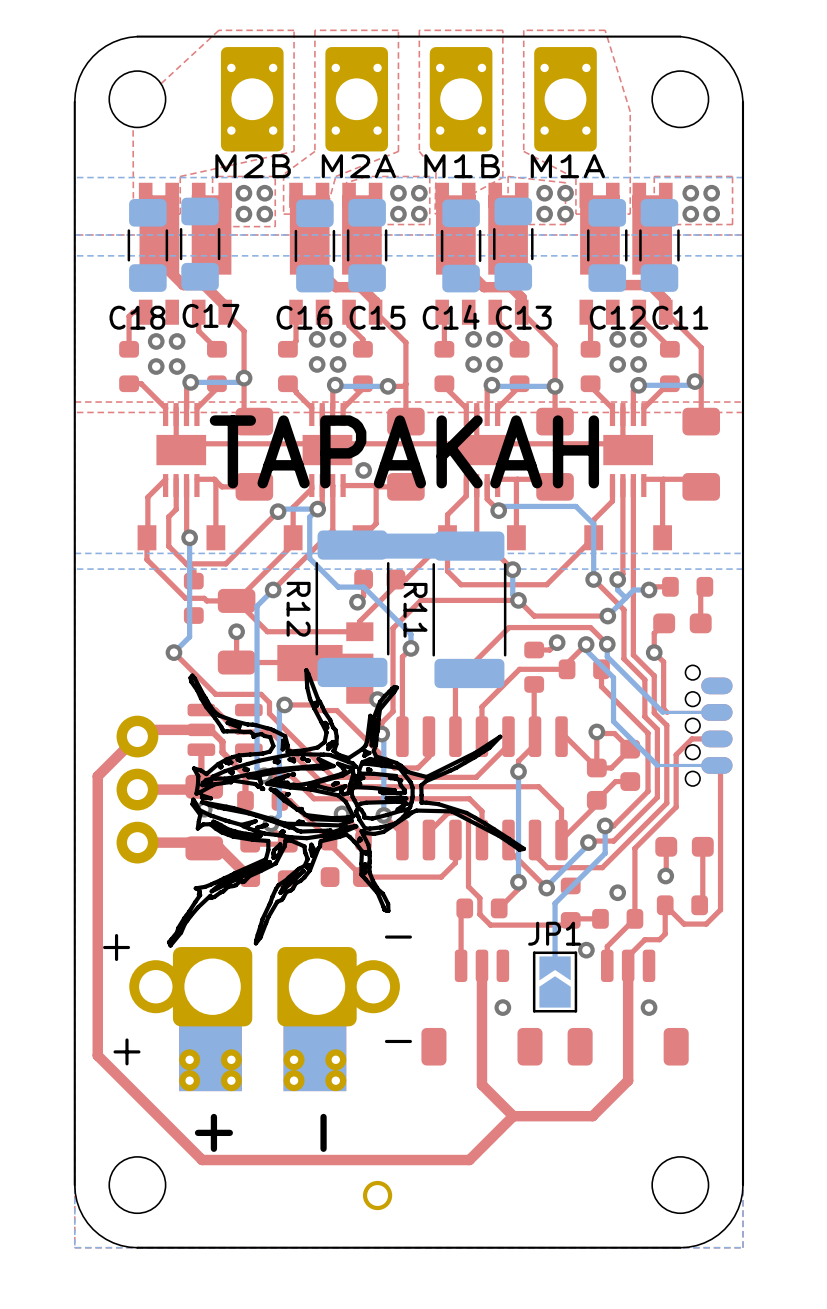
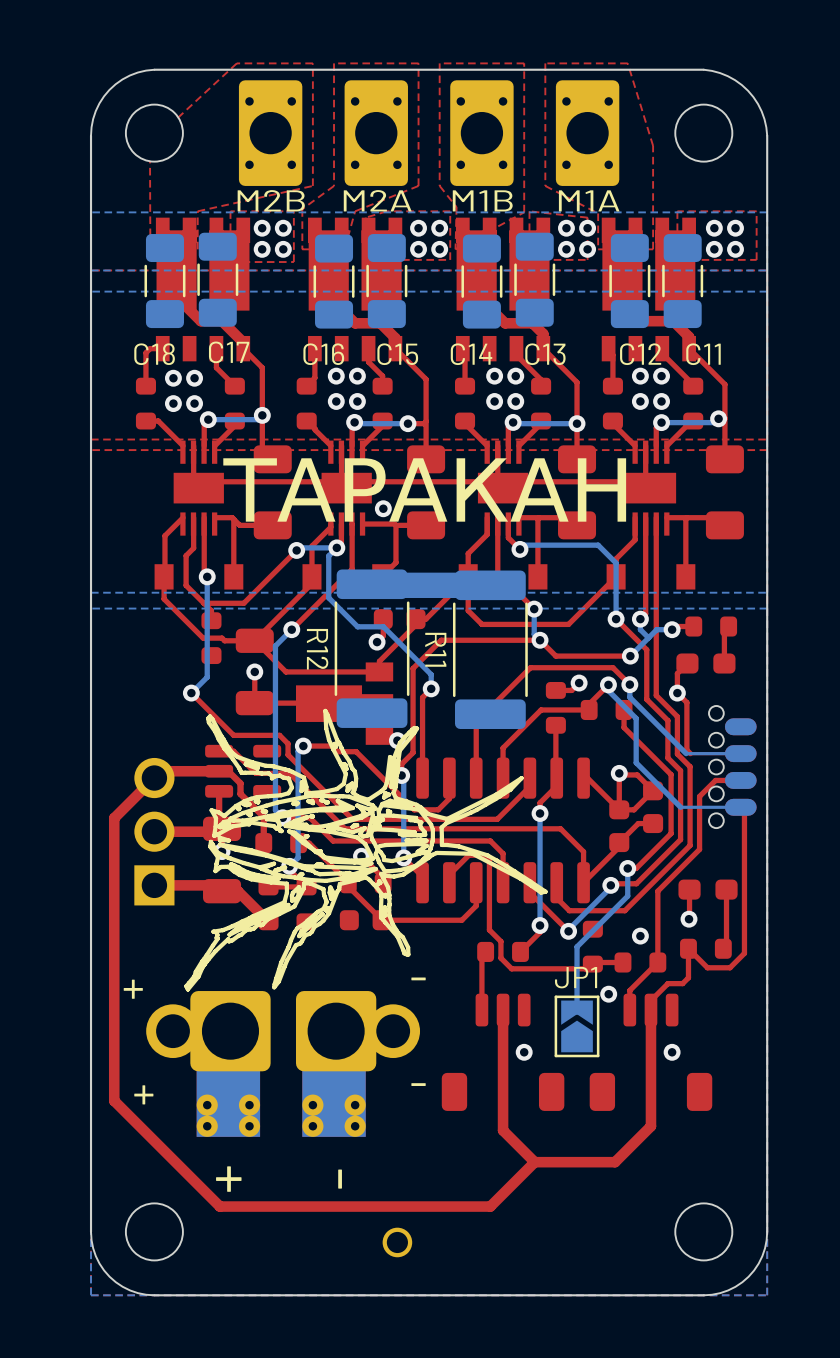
part footprint: [116, 715, 159, 864] -> [134, 757, 175, 906]

